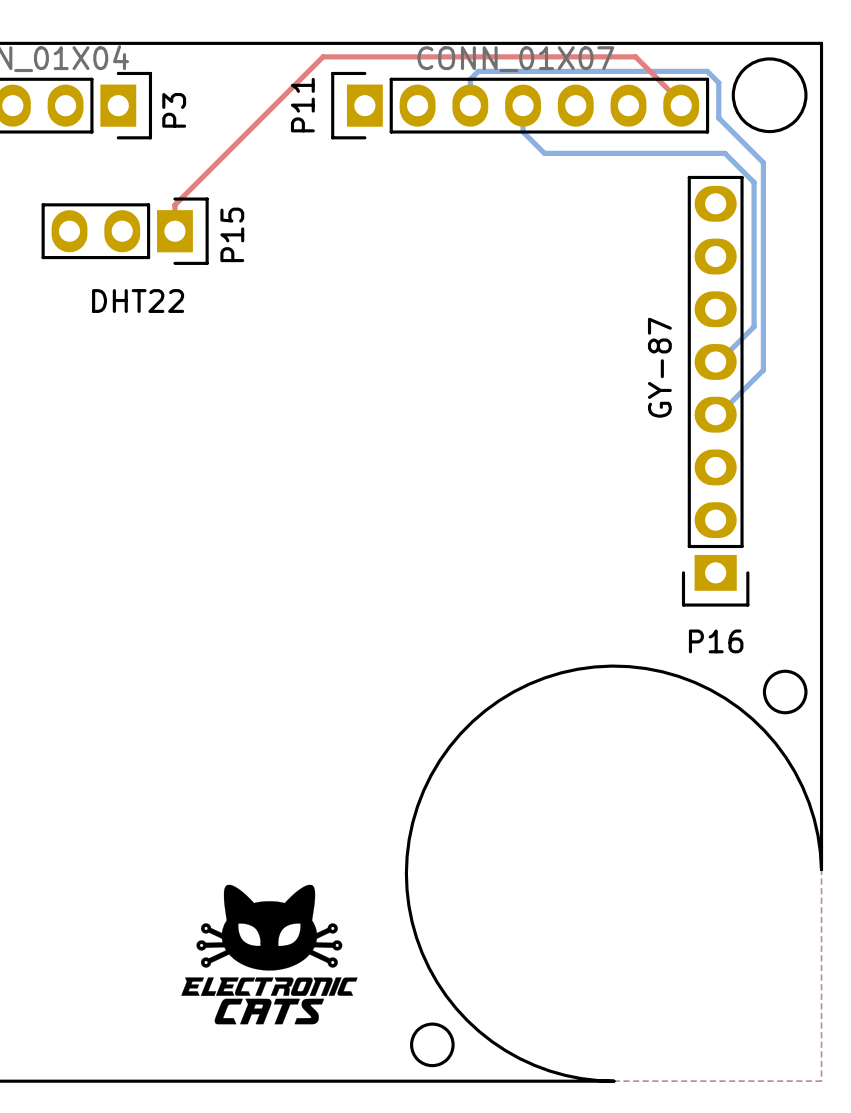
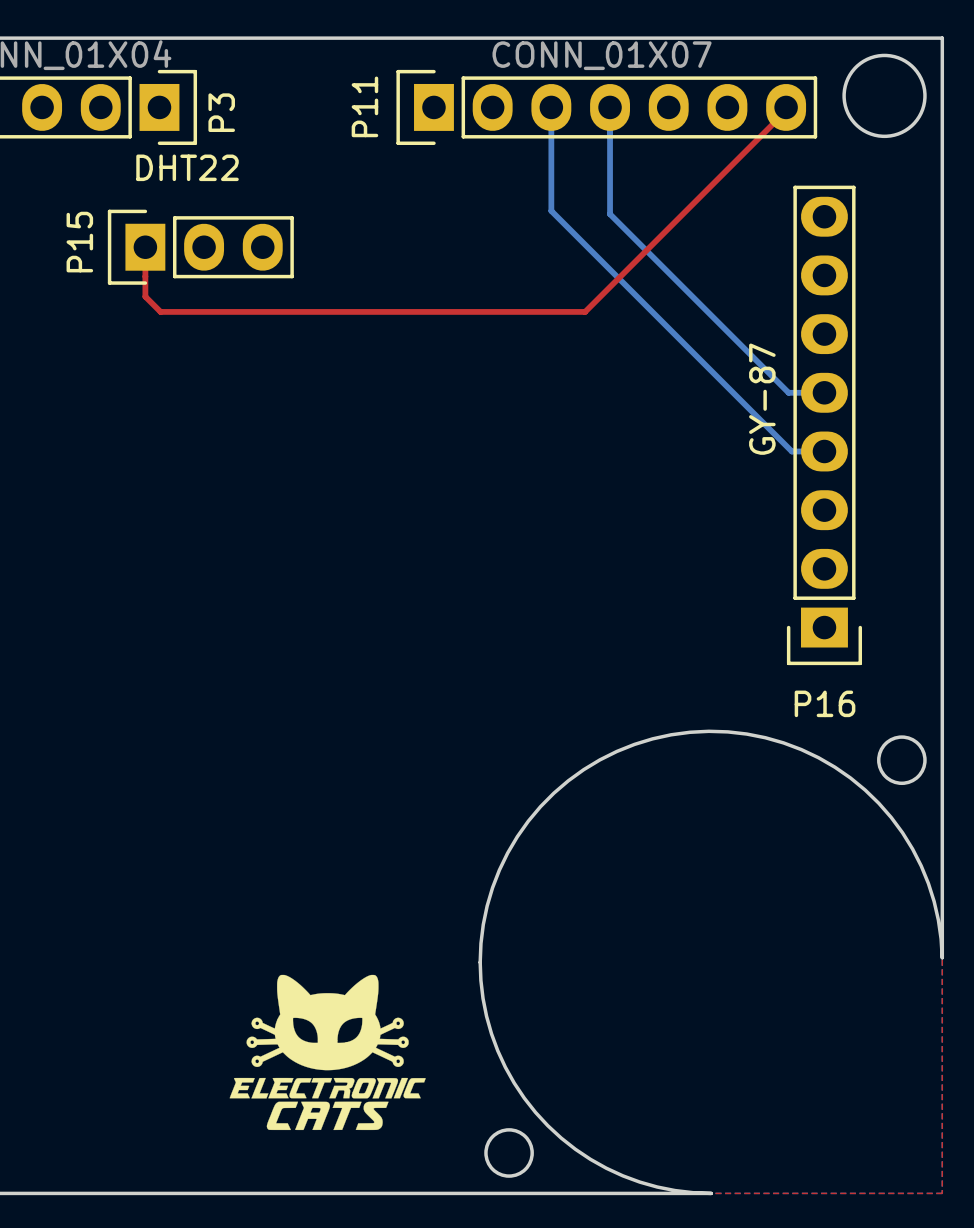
top track: (681, 102) (635, 56) (323, 56) (174, 204) (174, 231) -> none
bottom track: (470, 105) (470, 79) (478, 71) (707, 71) (718, 82) (718, 118) (763, 162) (763, 370) (718, 414) -> (551, 107) (551, 210) (791, 451) (824, 451)
top track: none -> (786, 107) (786, 110) (585, 311) (160, 311) (145, 296) (145, 247)
bottom track: (523, 131) (544, 153) (725, 153) (754, 182) (754, 326) (718, 361) -> (610, 136) (610, 214) (788, 392) (824, 392)
P15 rotation: 0° (125, 231) -> 180° (200, 247)

